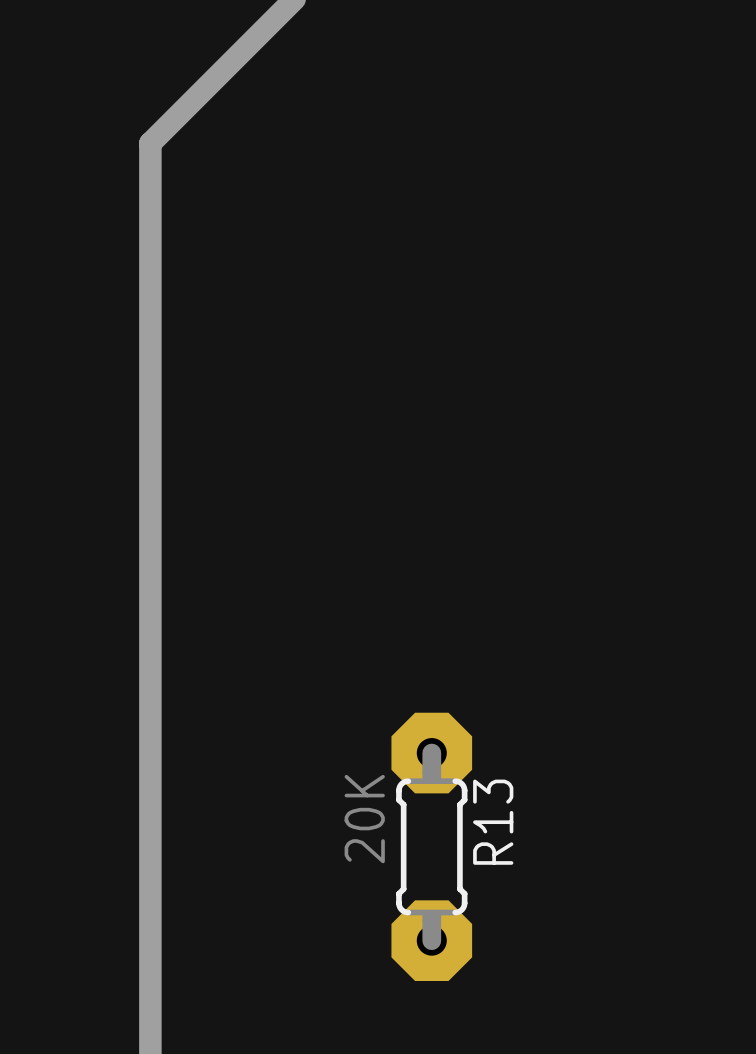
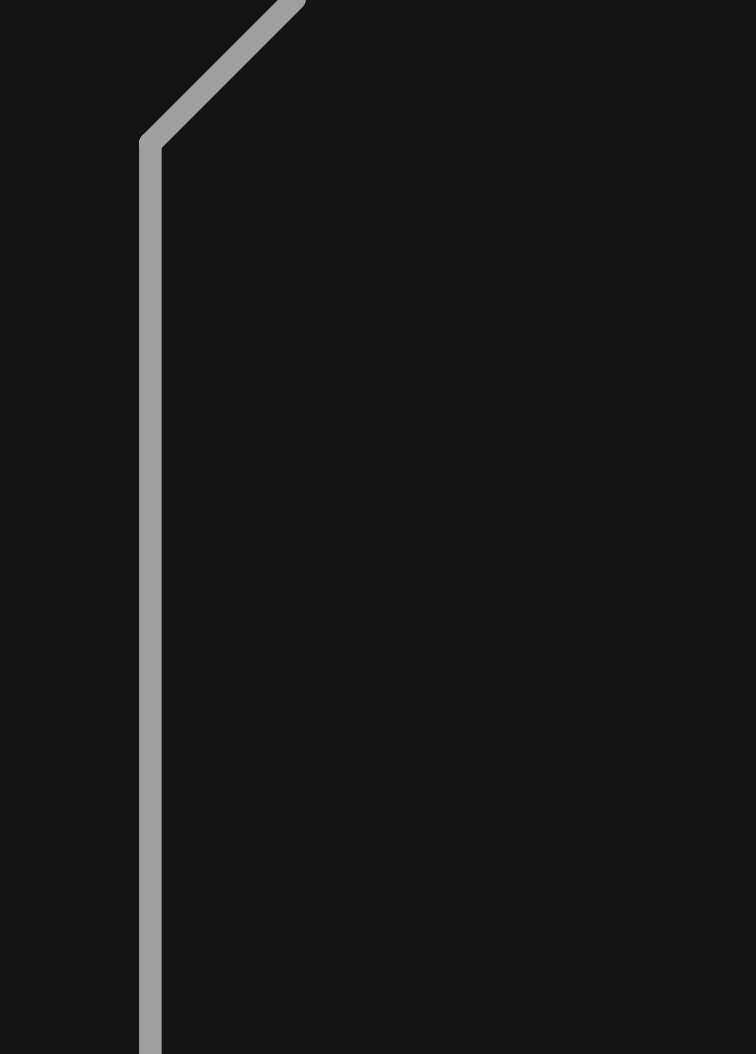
R13: 20K (431, 846) -> none

